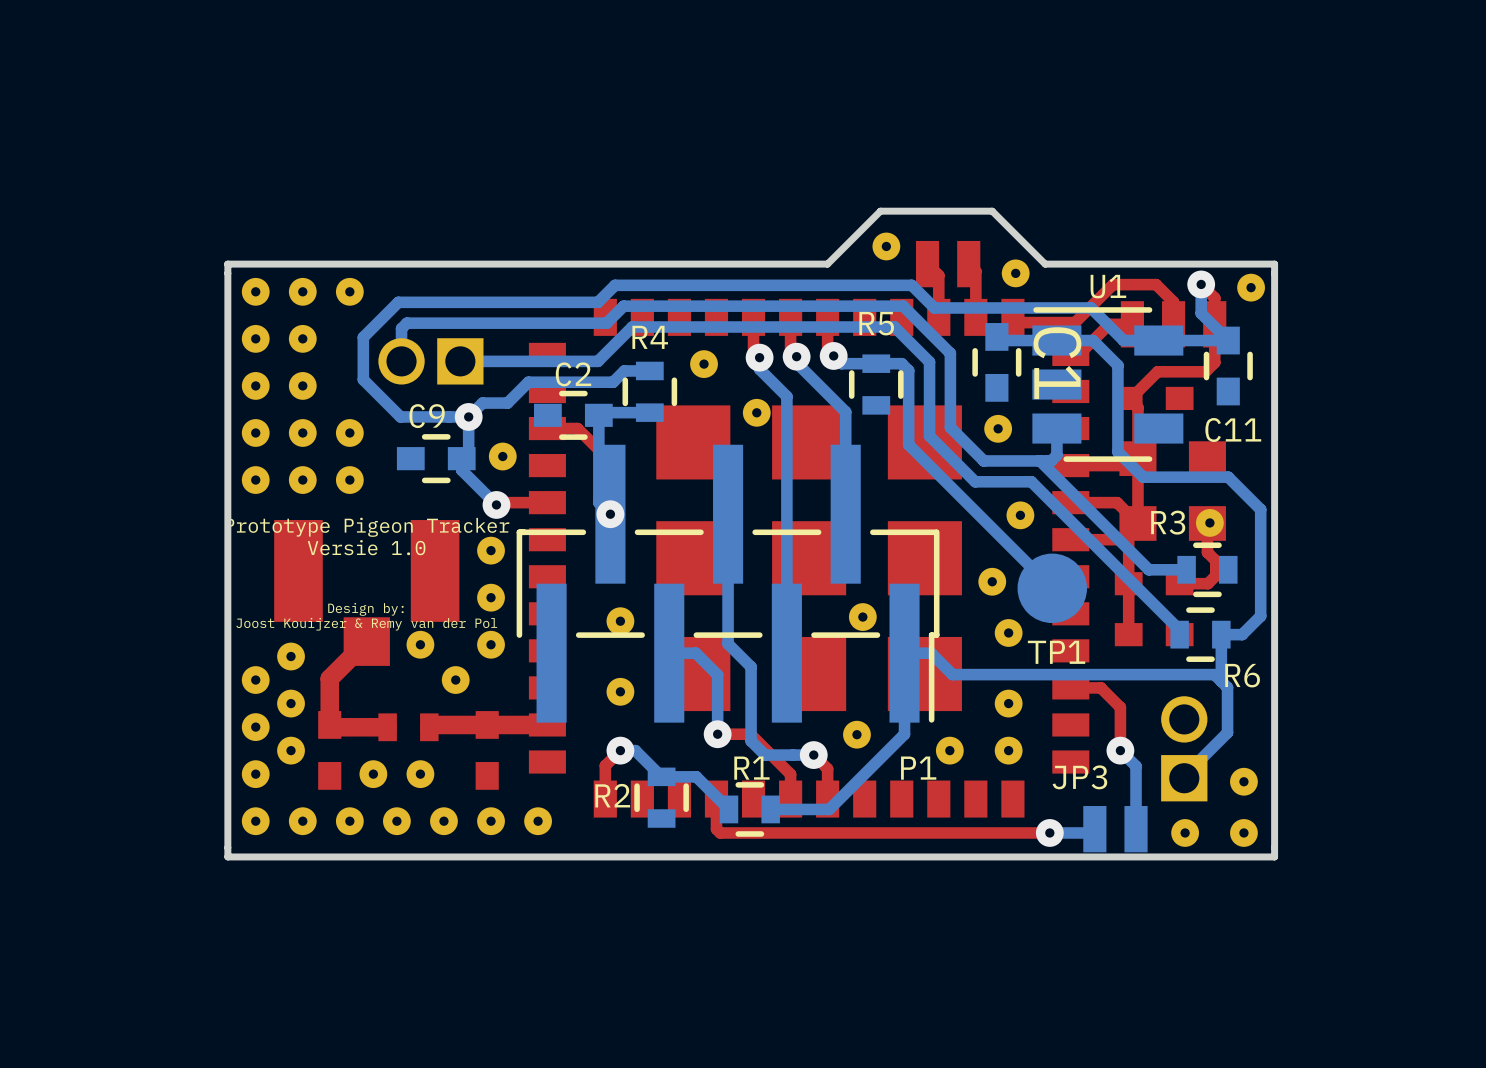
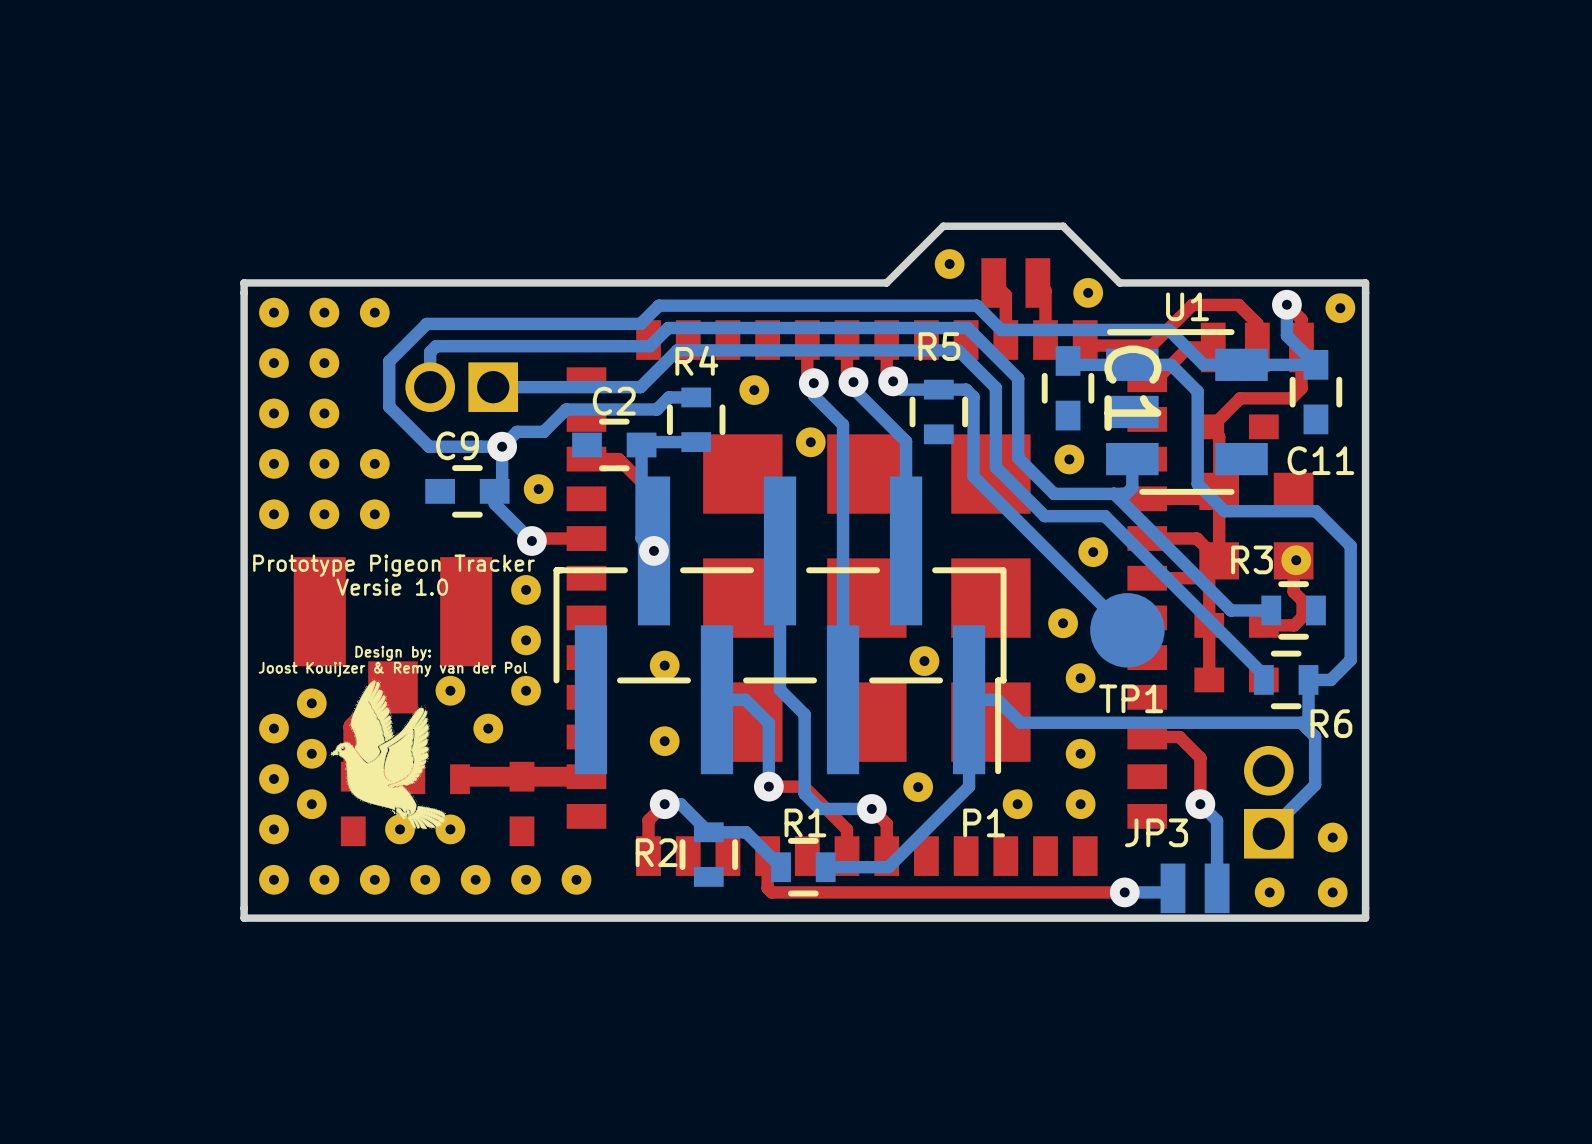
drawing: none -> [329, 678, 447, 831]

